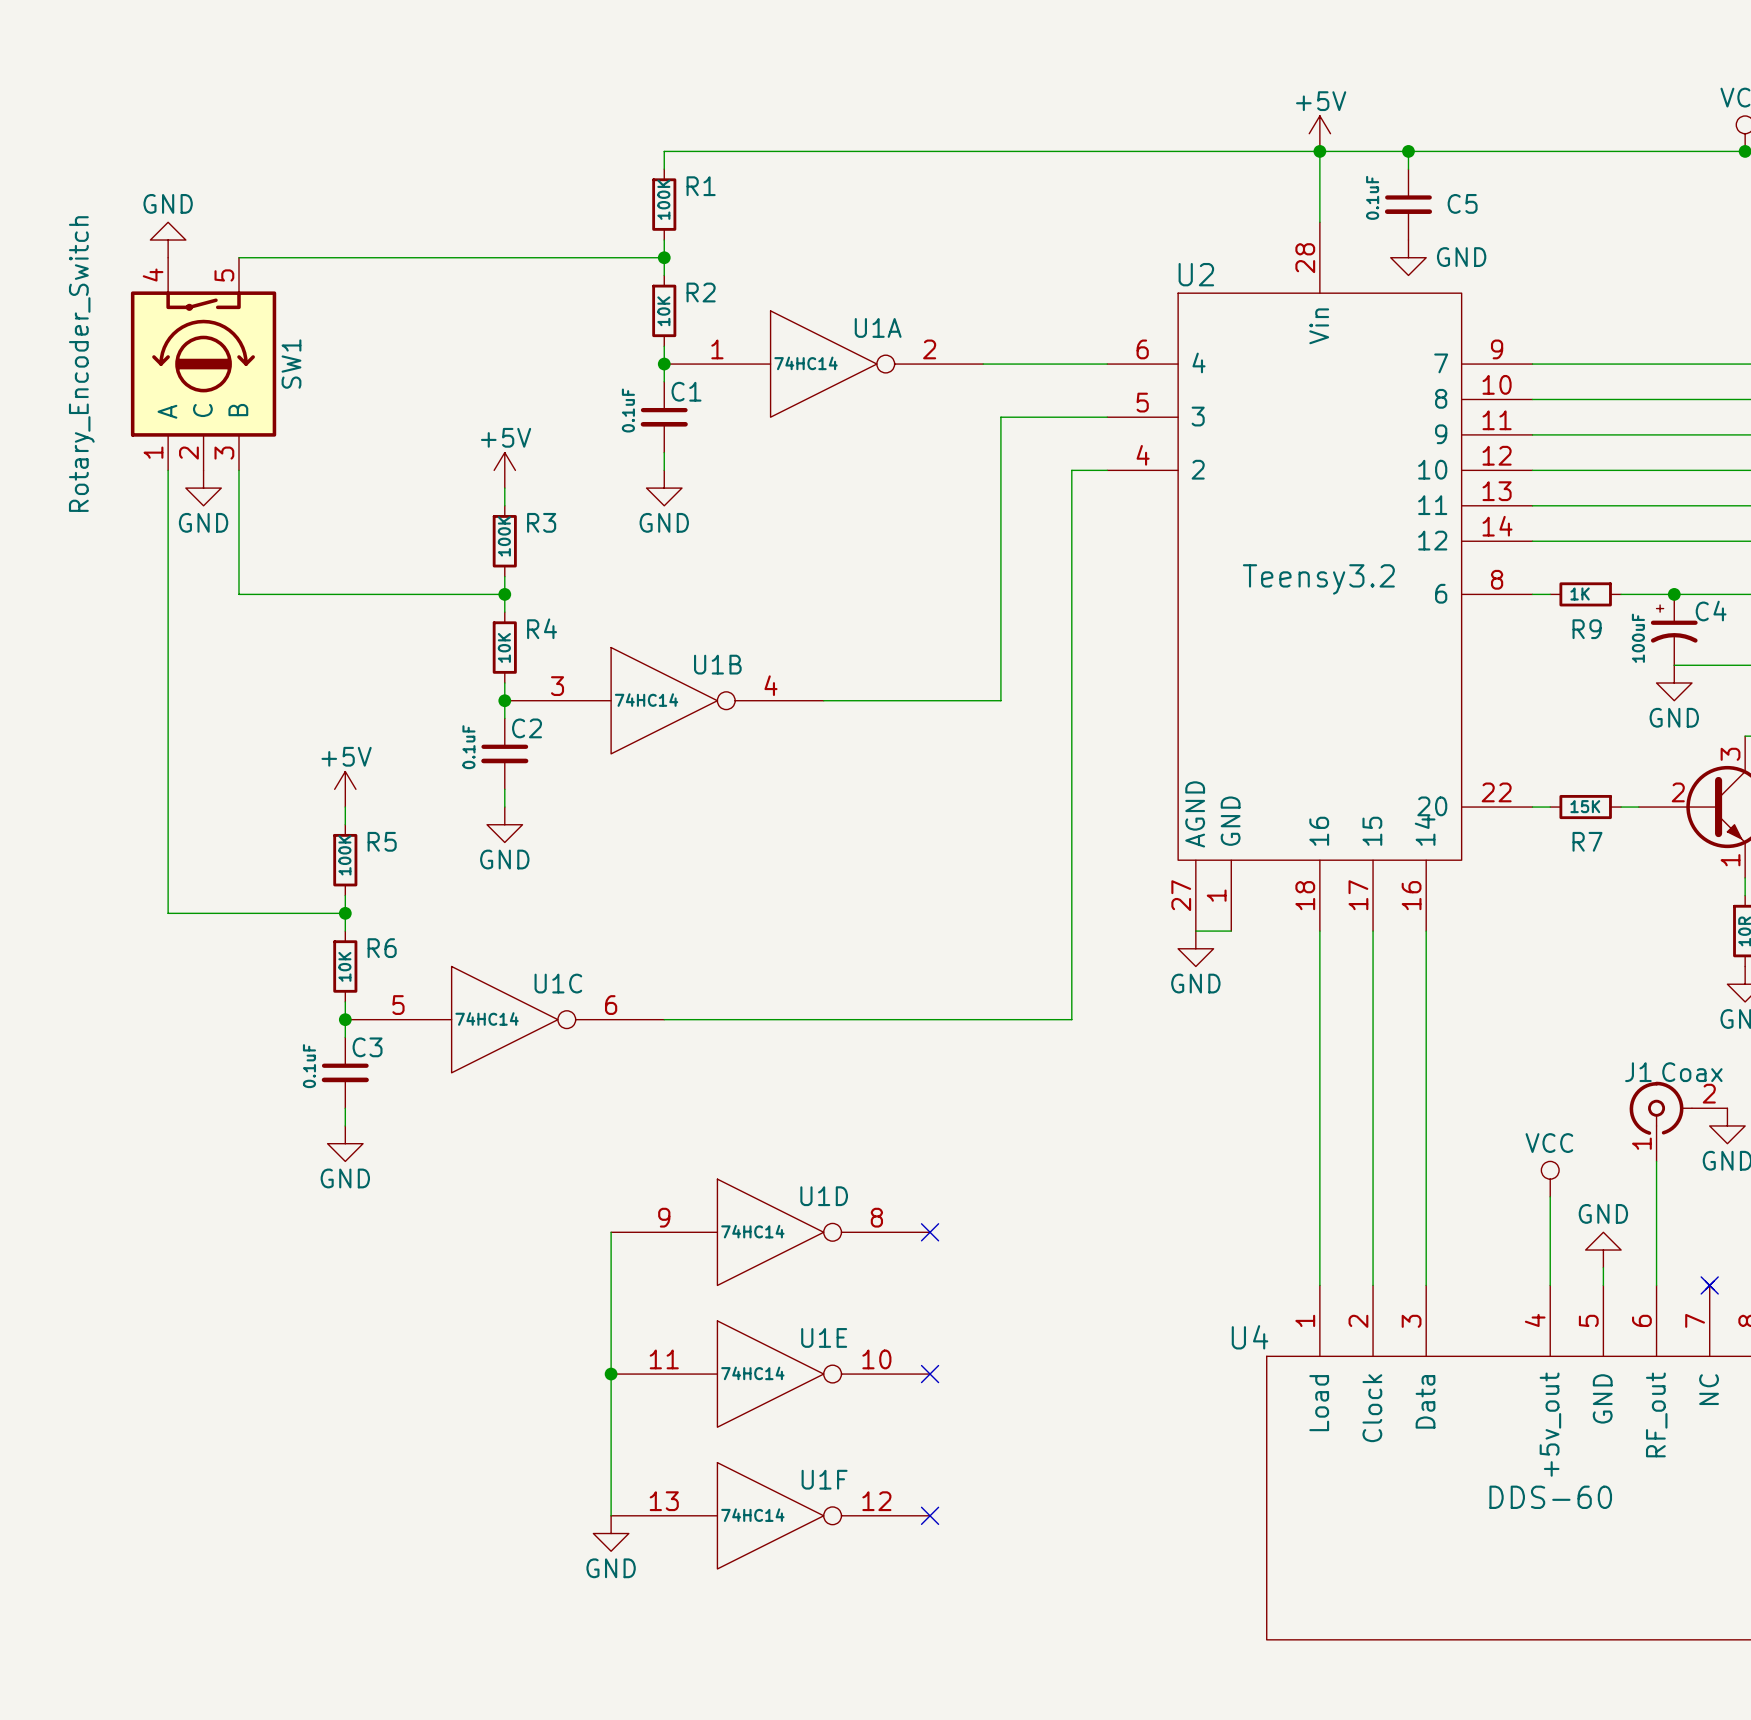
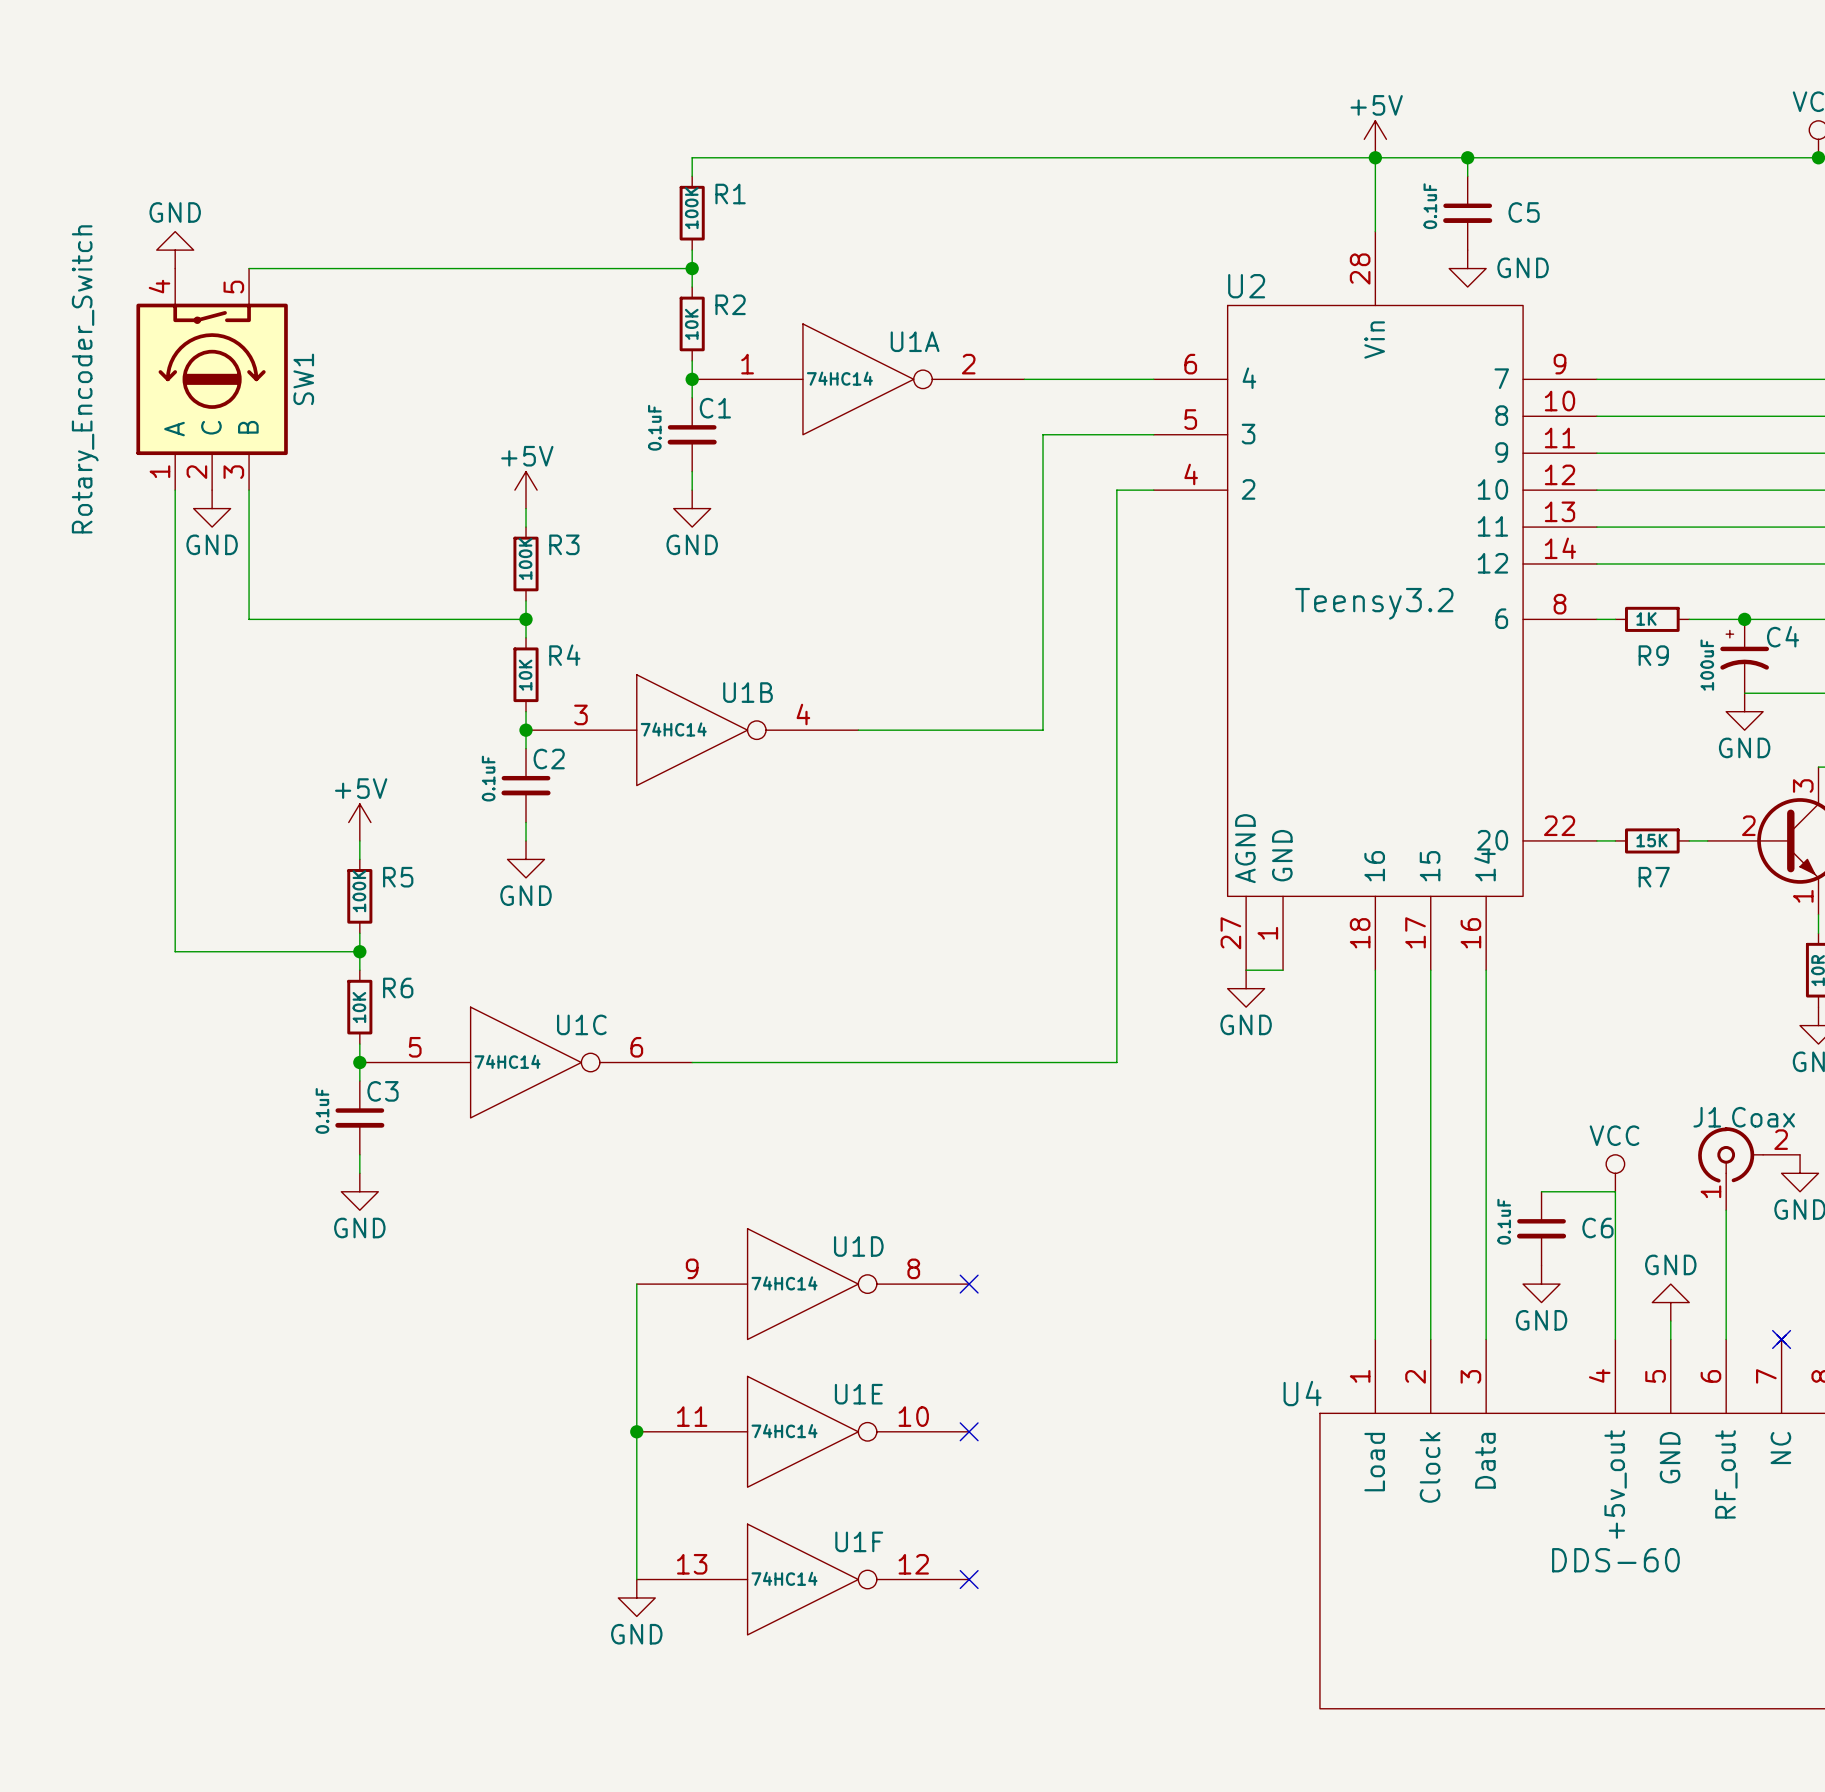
wire: none -> (1541, 1191) (1615, 1191) (1615, 1247)
C6: none -> 0.1uF (1541, 1228)
power symbol position: VCC (1550, 1179) -> VCC (1615, 1173)
power symbol: none -> GND (1541, 1284)

